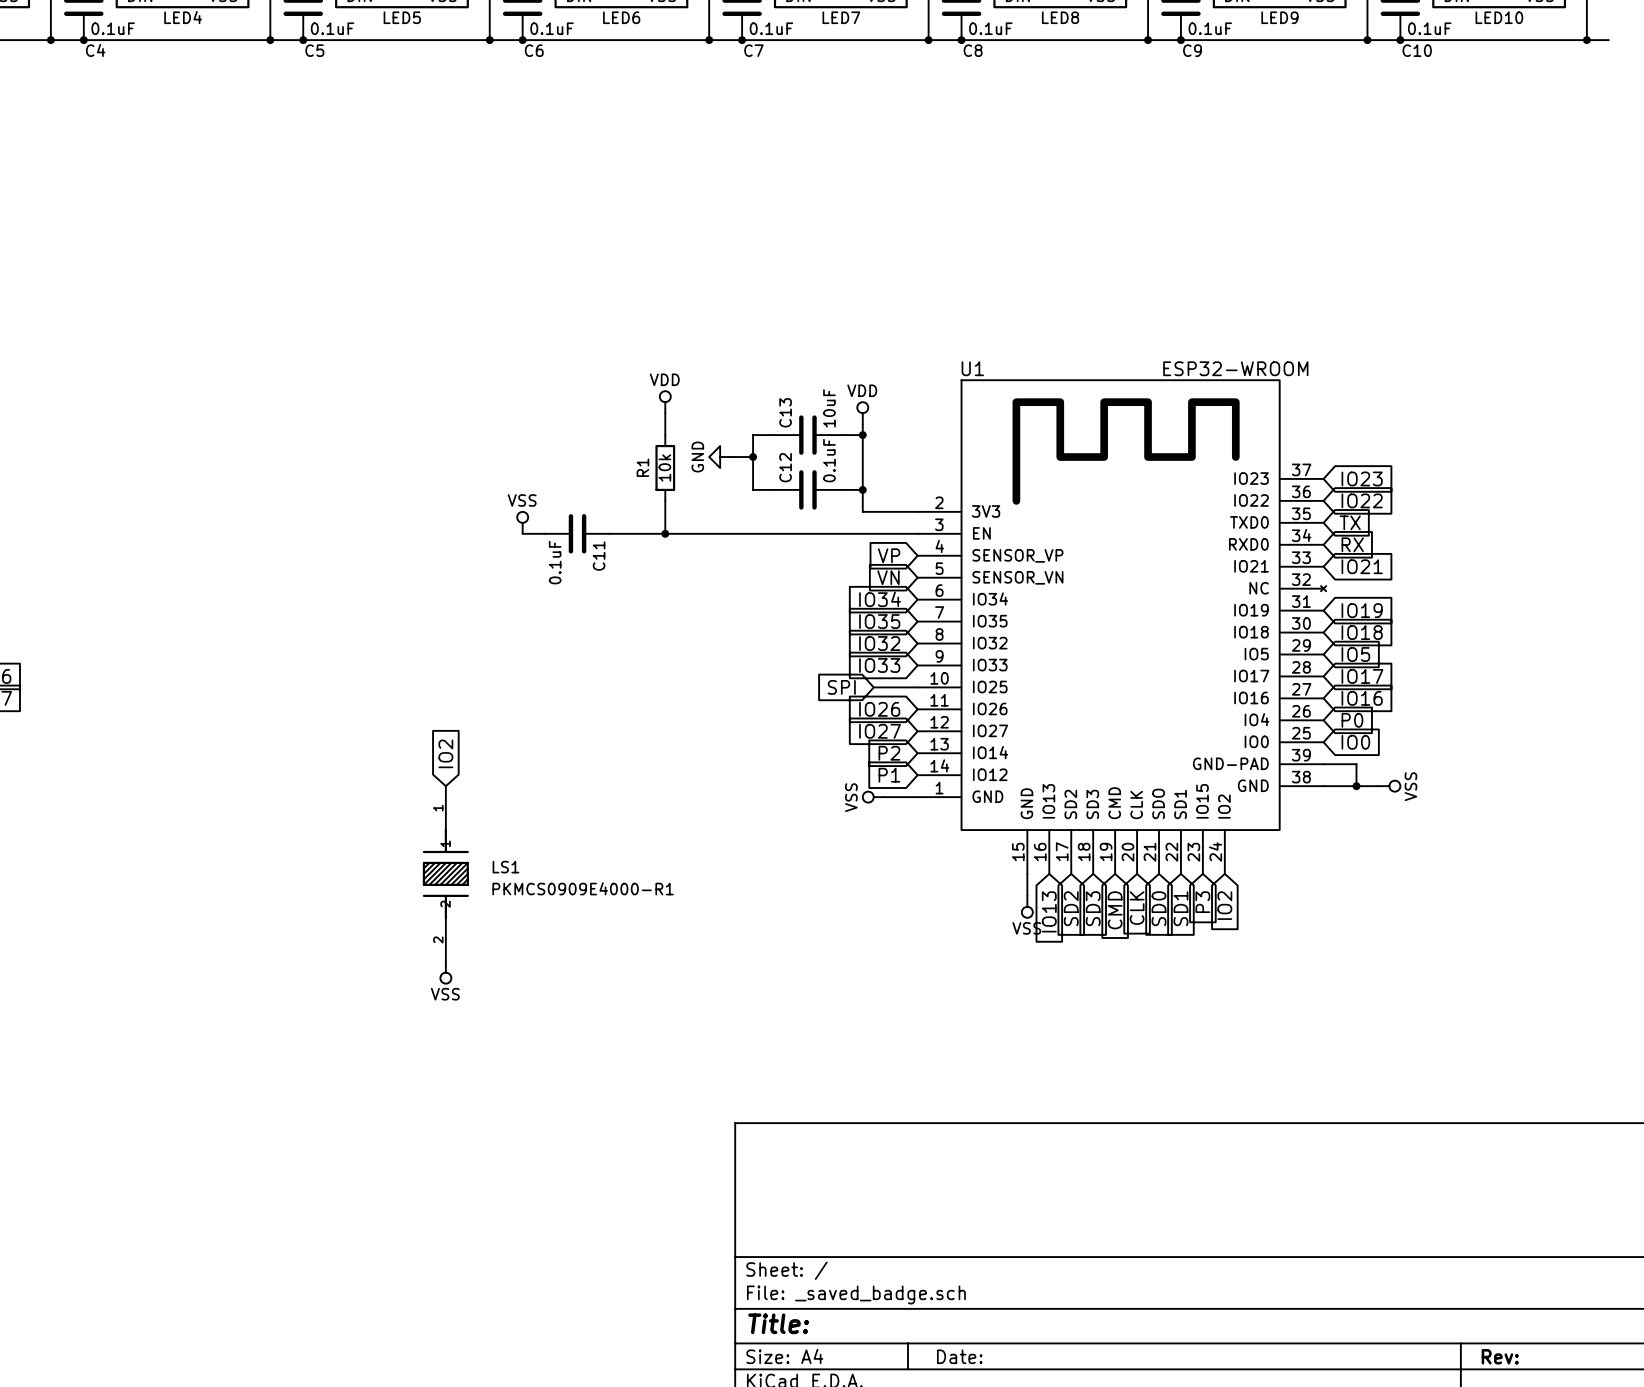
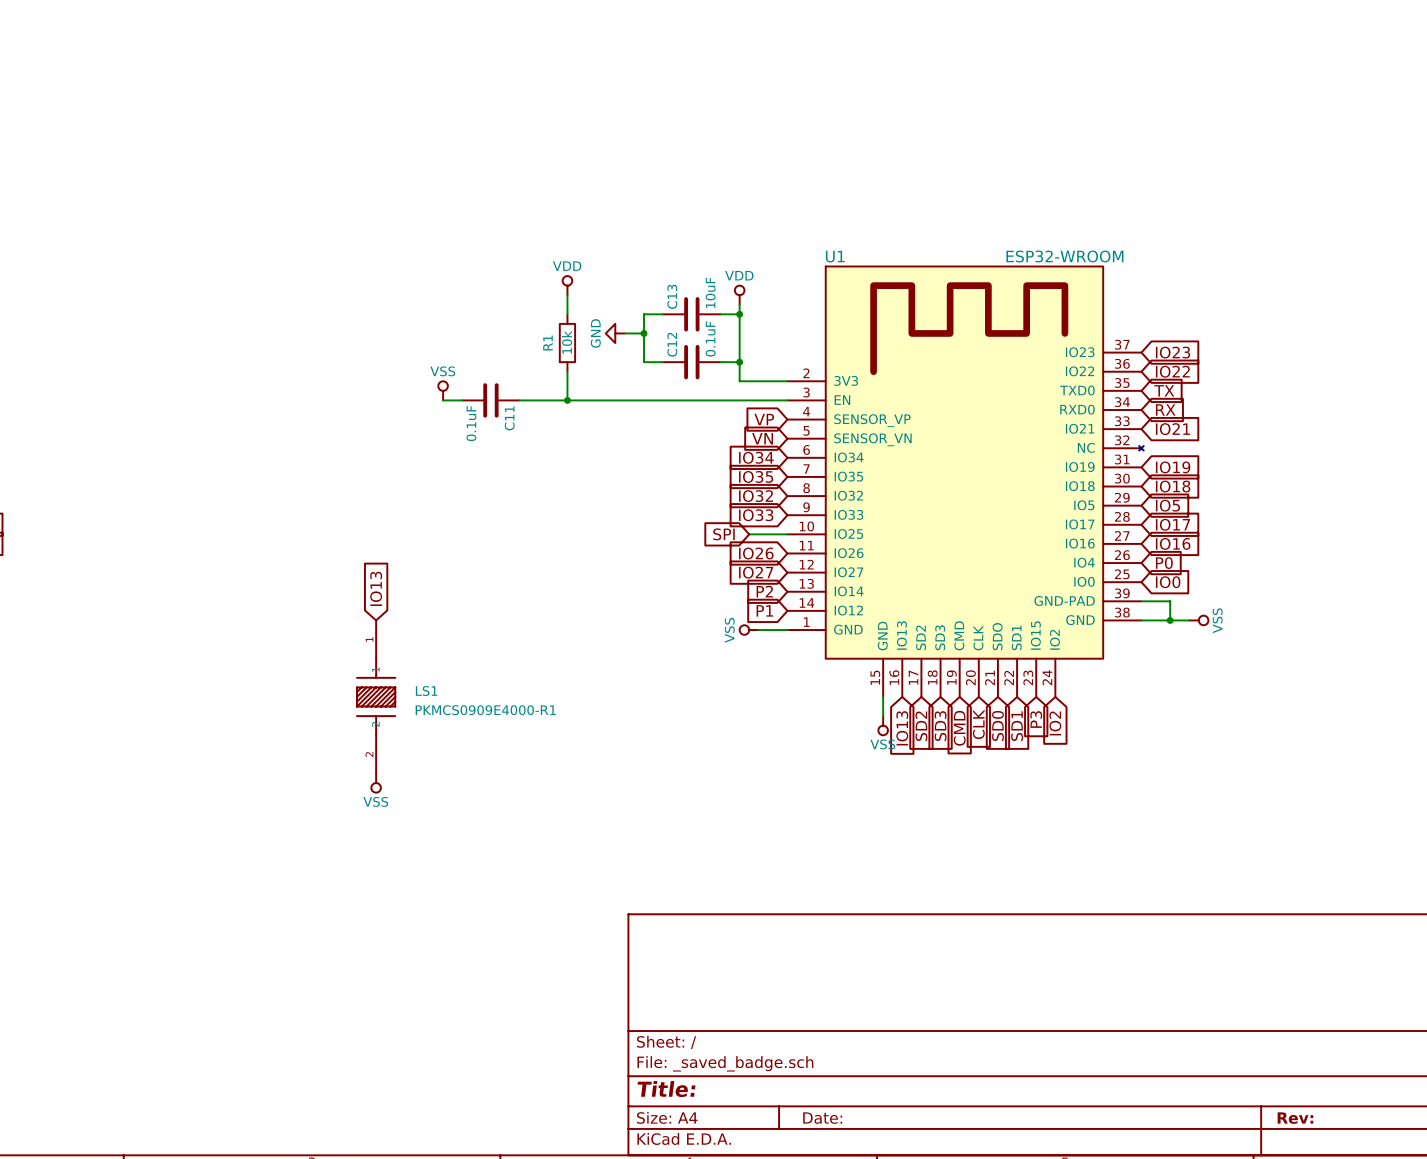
global label: IO2 (445, 753) -> IO13 (376, 588)

